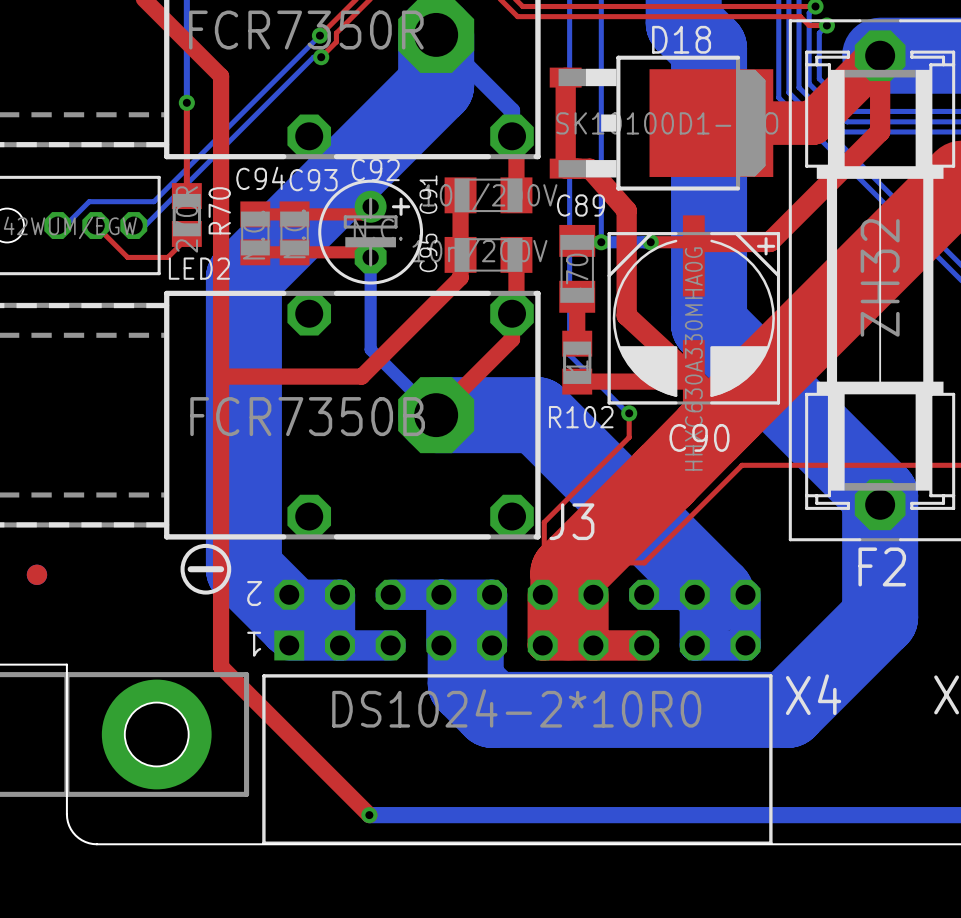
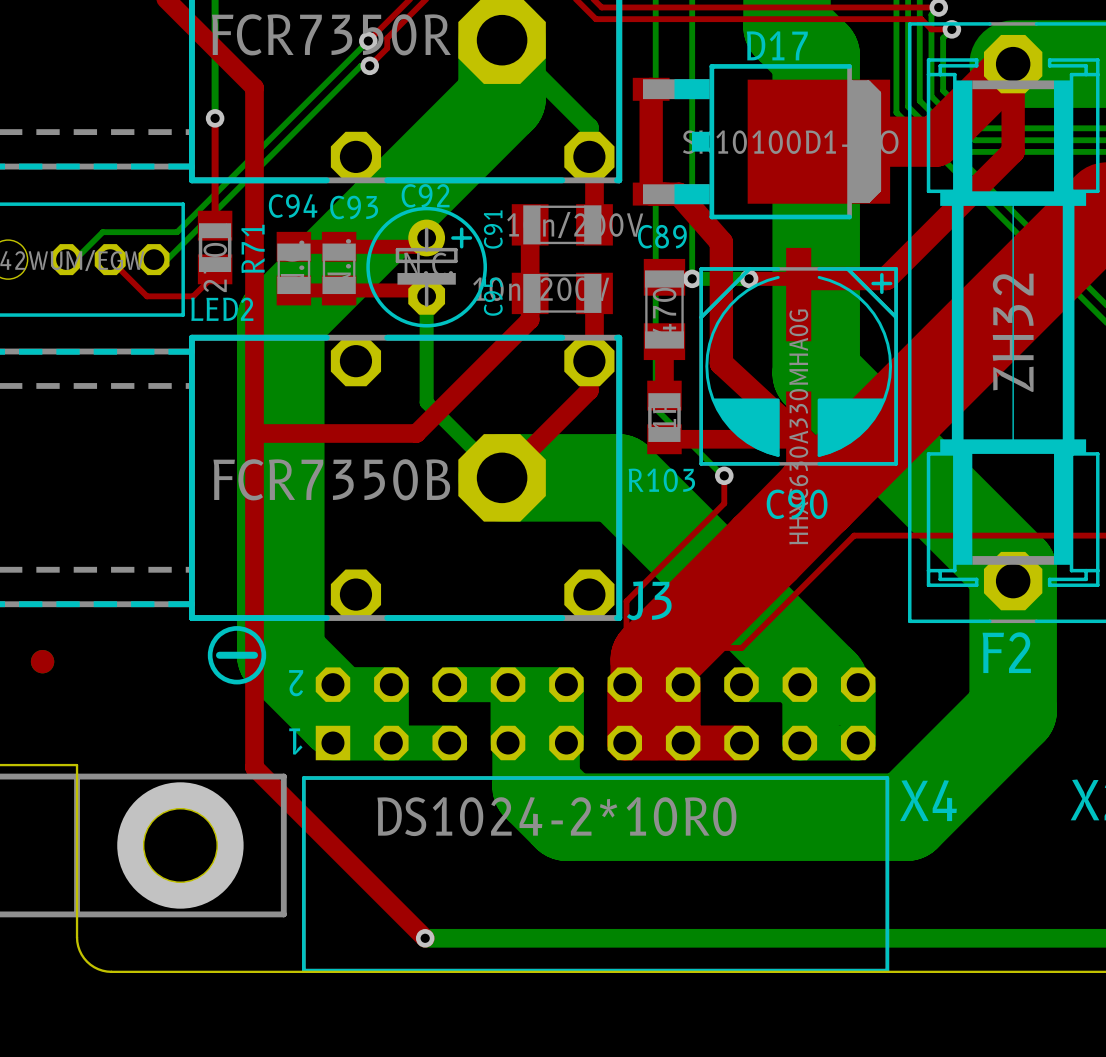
D18 name: D18 (681, 39) -> D17 (777, 45)
R70 name: R70 (219, 210) -> R71 (252, 248)
R102 name: R102 (581, 417) -> R103 (661, 480)

